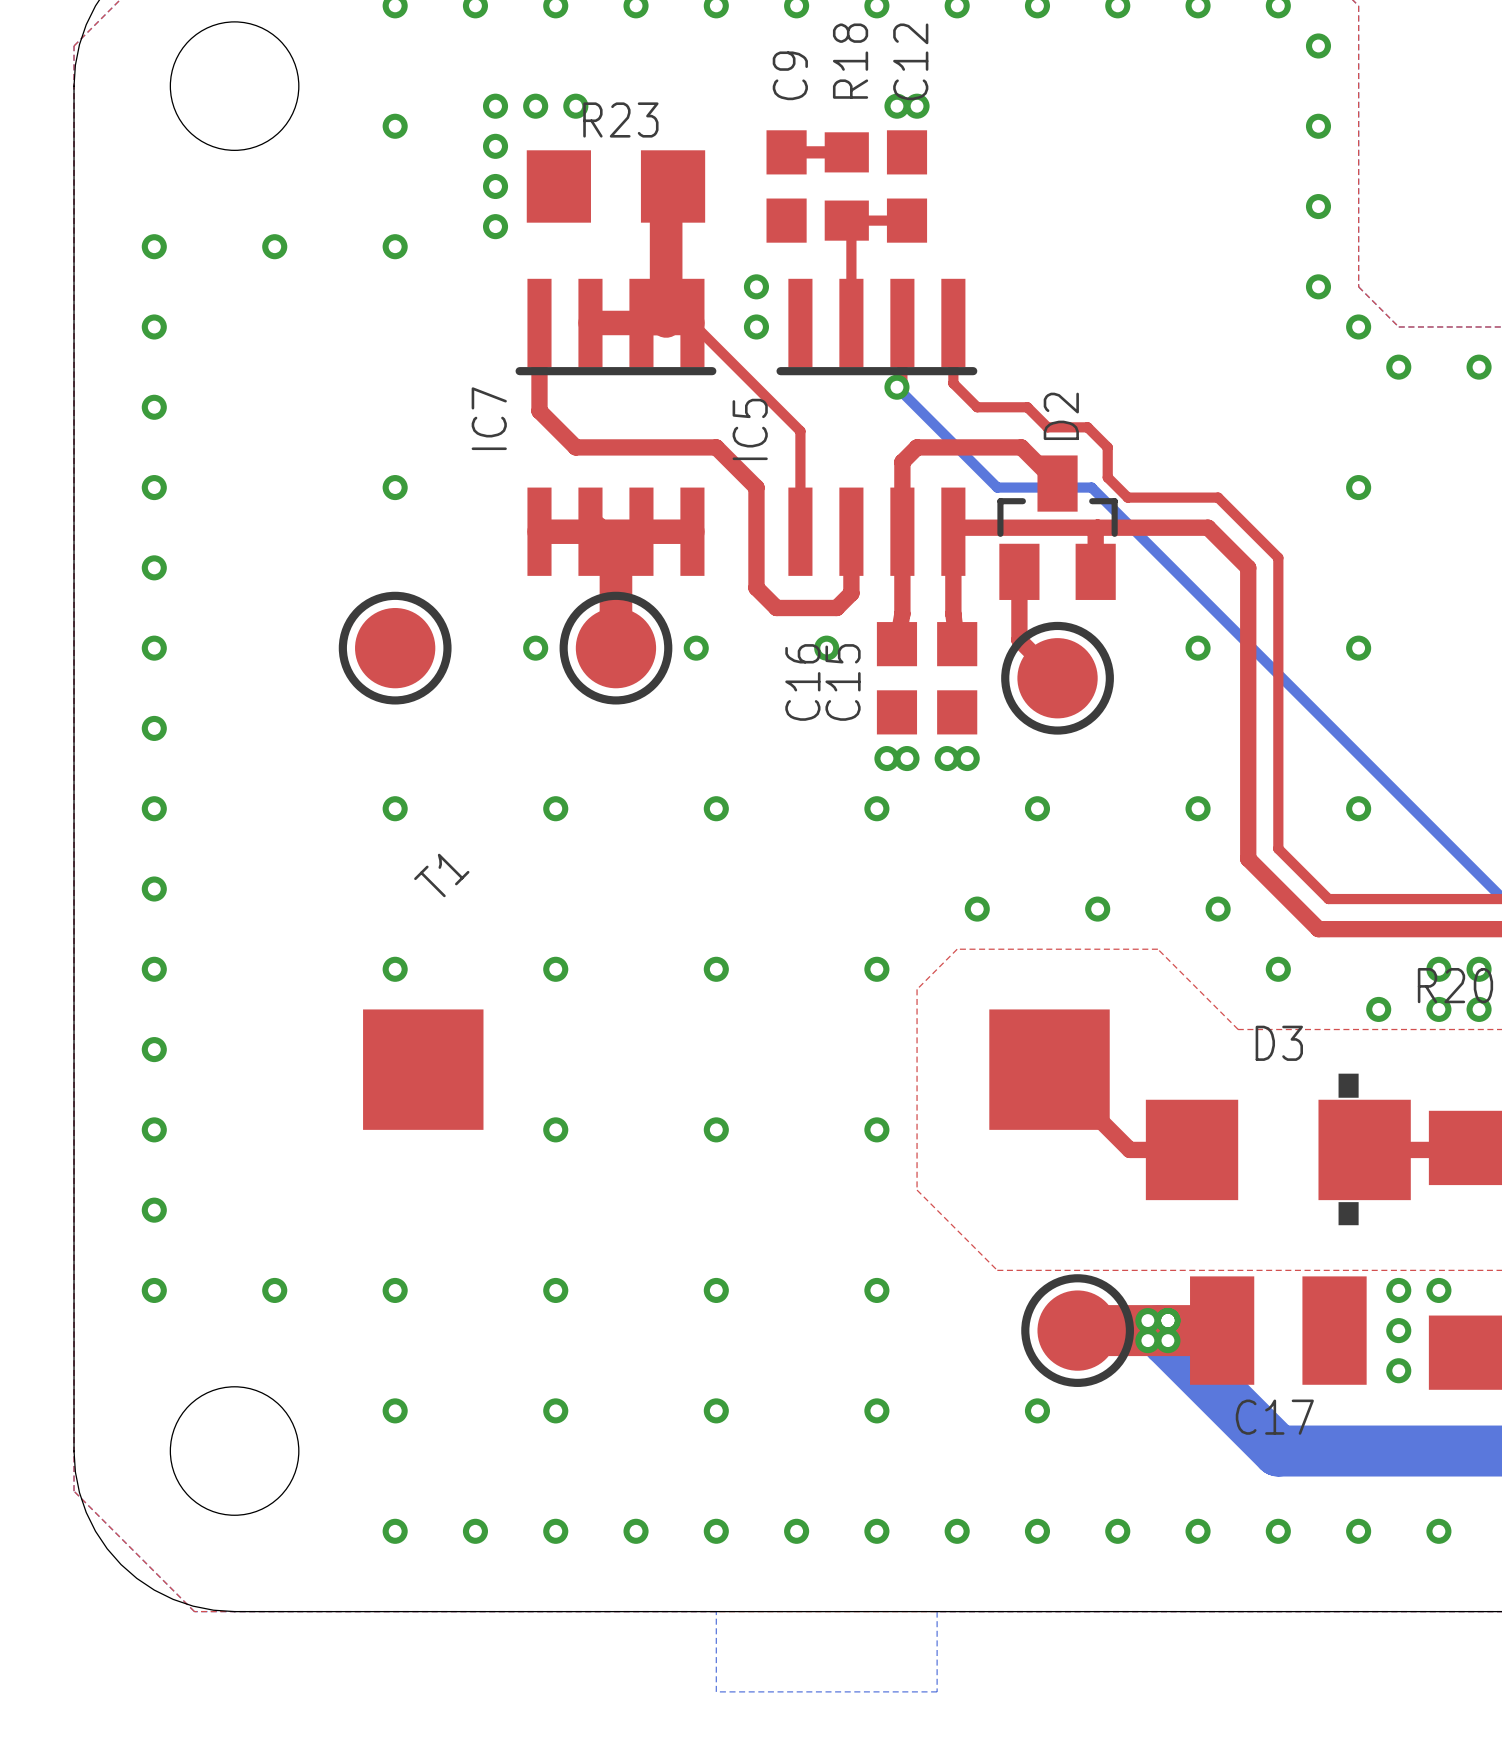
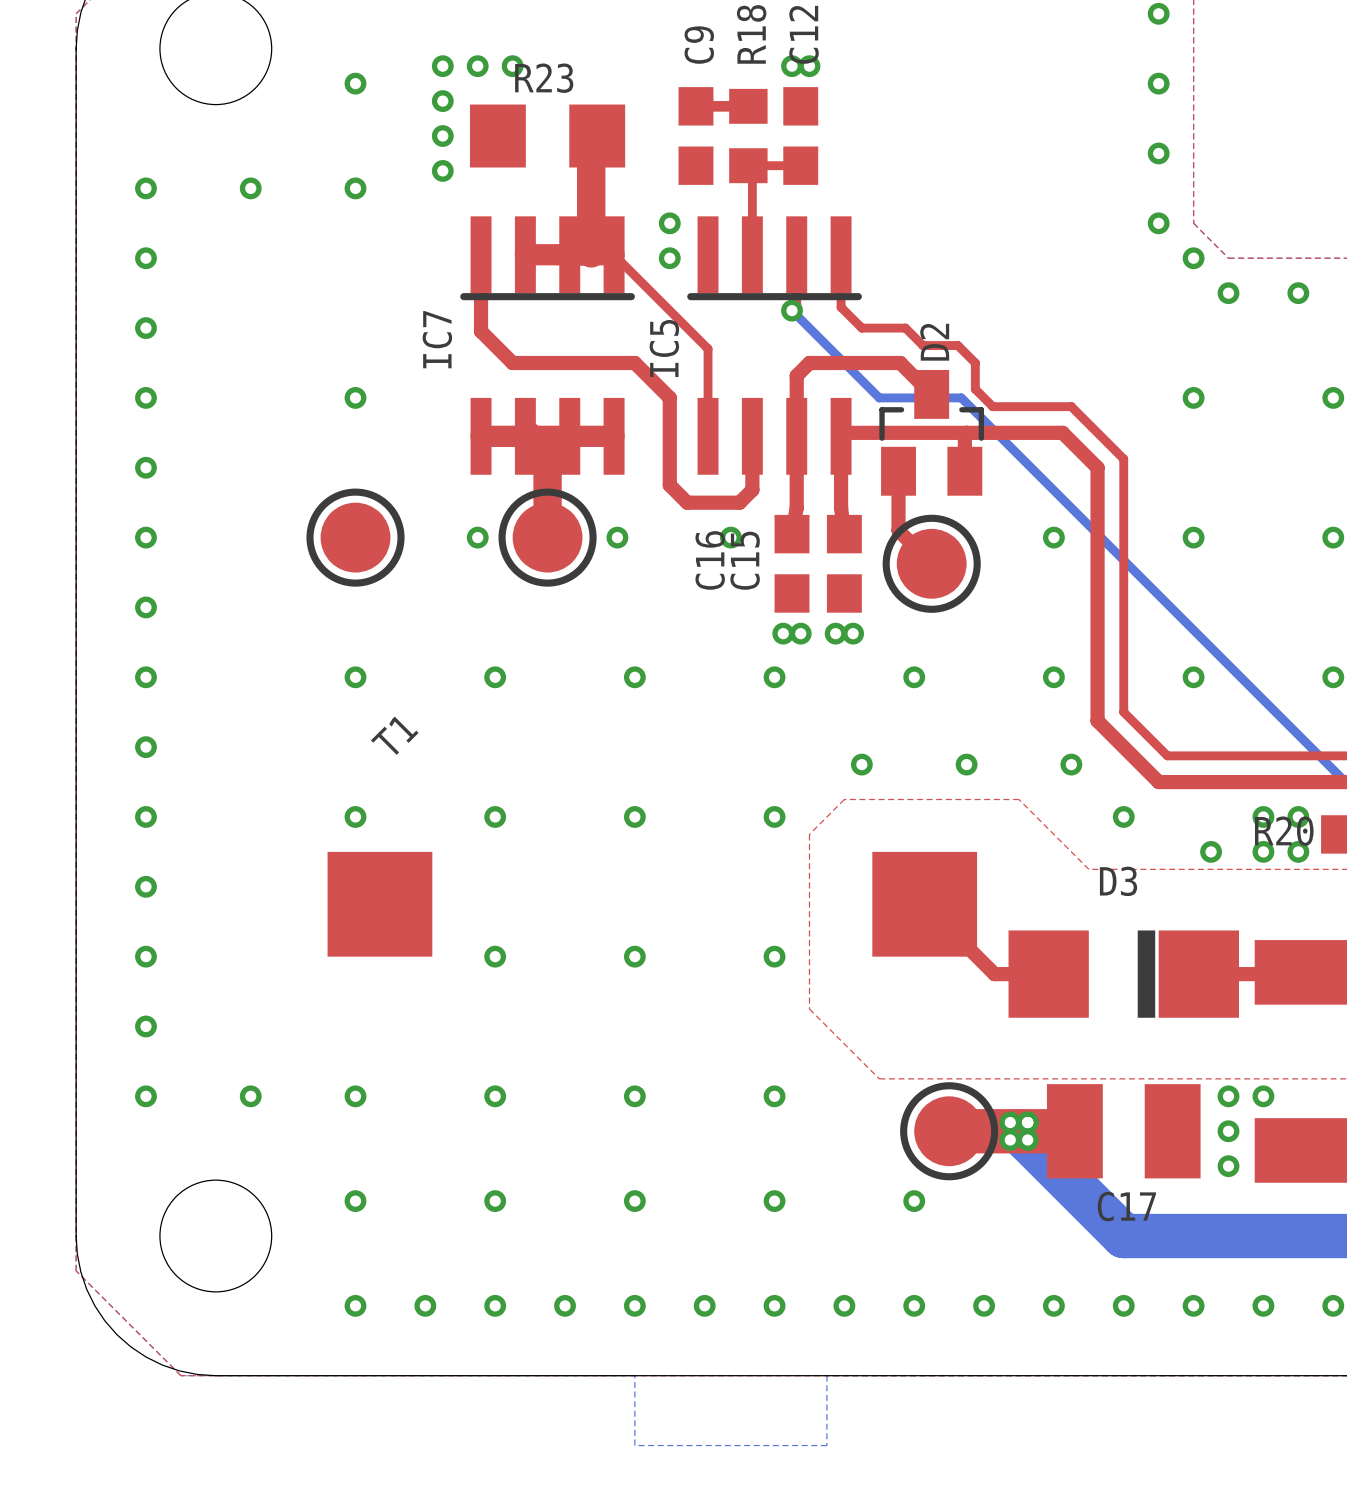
D3 footprint: [1145, 1073, 1411, 1226] -> [1008, 930, 1239, 1018]

